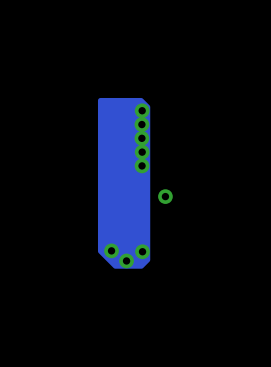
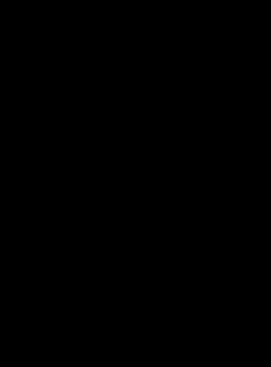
drawing: [97, 97, 151, 269] -> none
via: (142, 110) -> none
via: (141, 124) -> none
via: (141, 138) -> none
via: (142, 152) -> none
via: (142, 165) -> none
via: (165, 196) -> none
via: (111, 250) -> none
via: (142, 251) -> none
via: (126, 260) -> none

